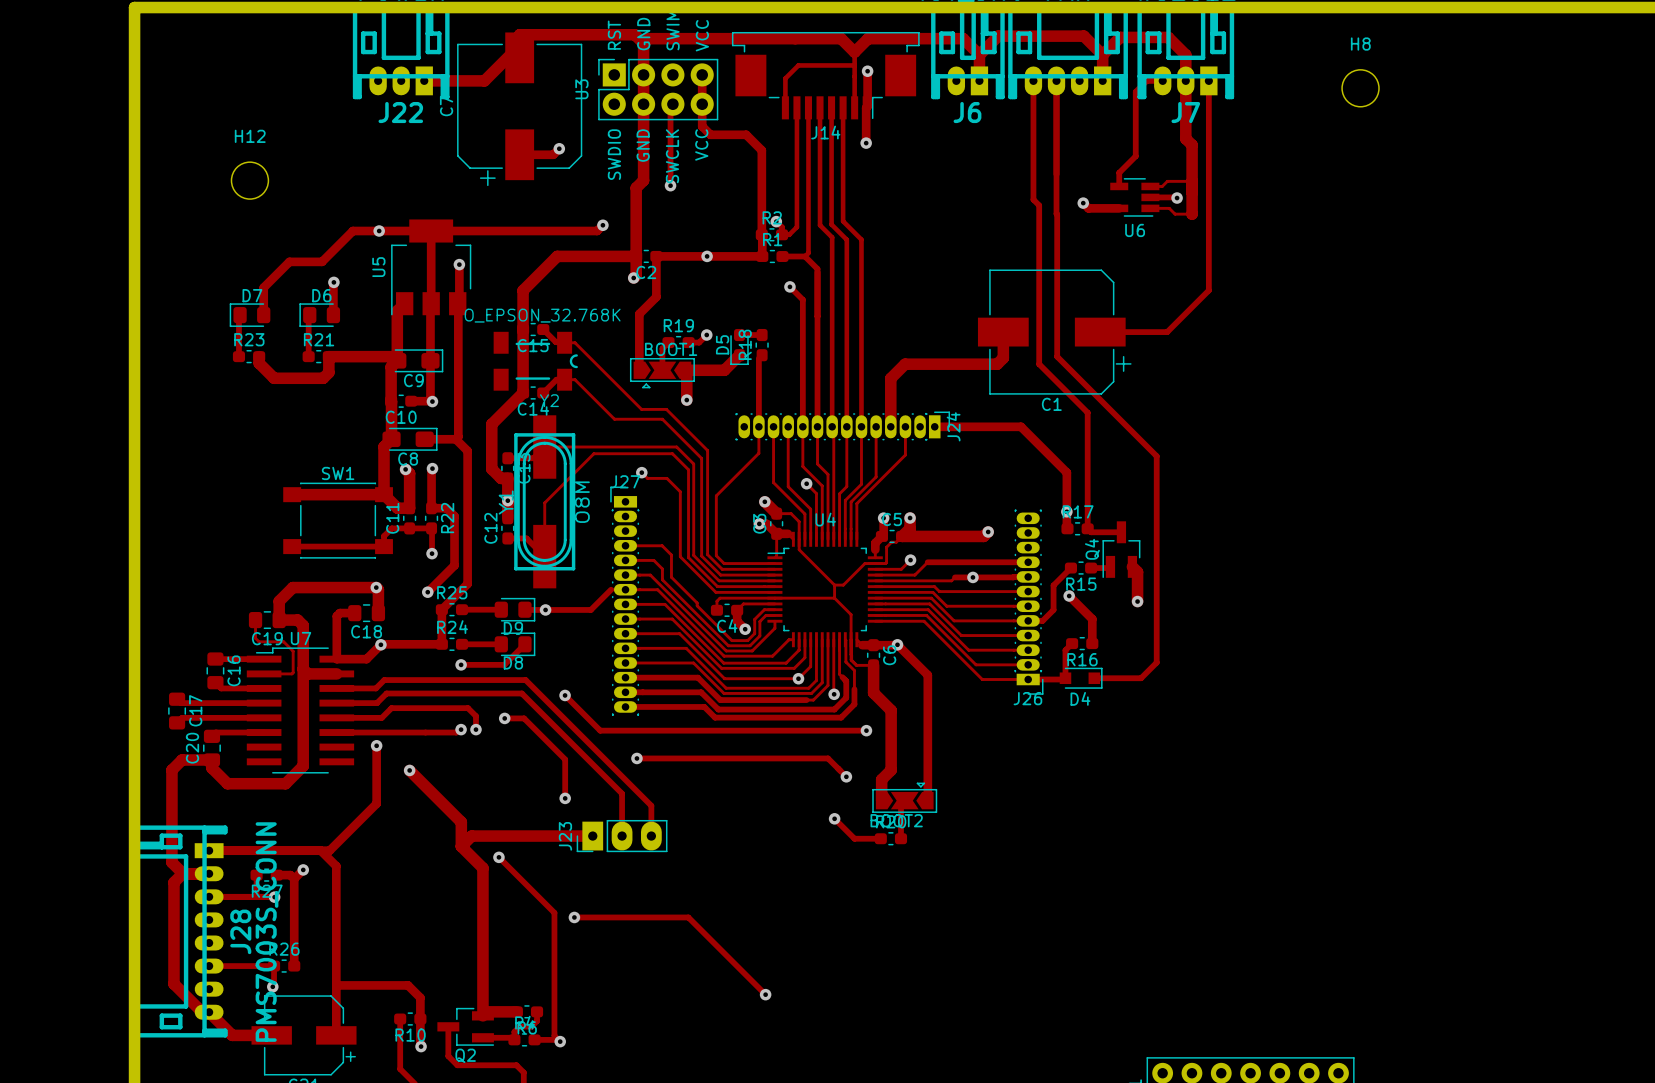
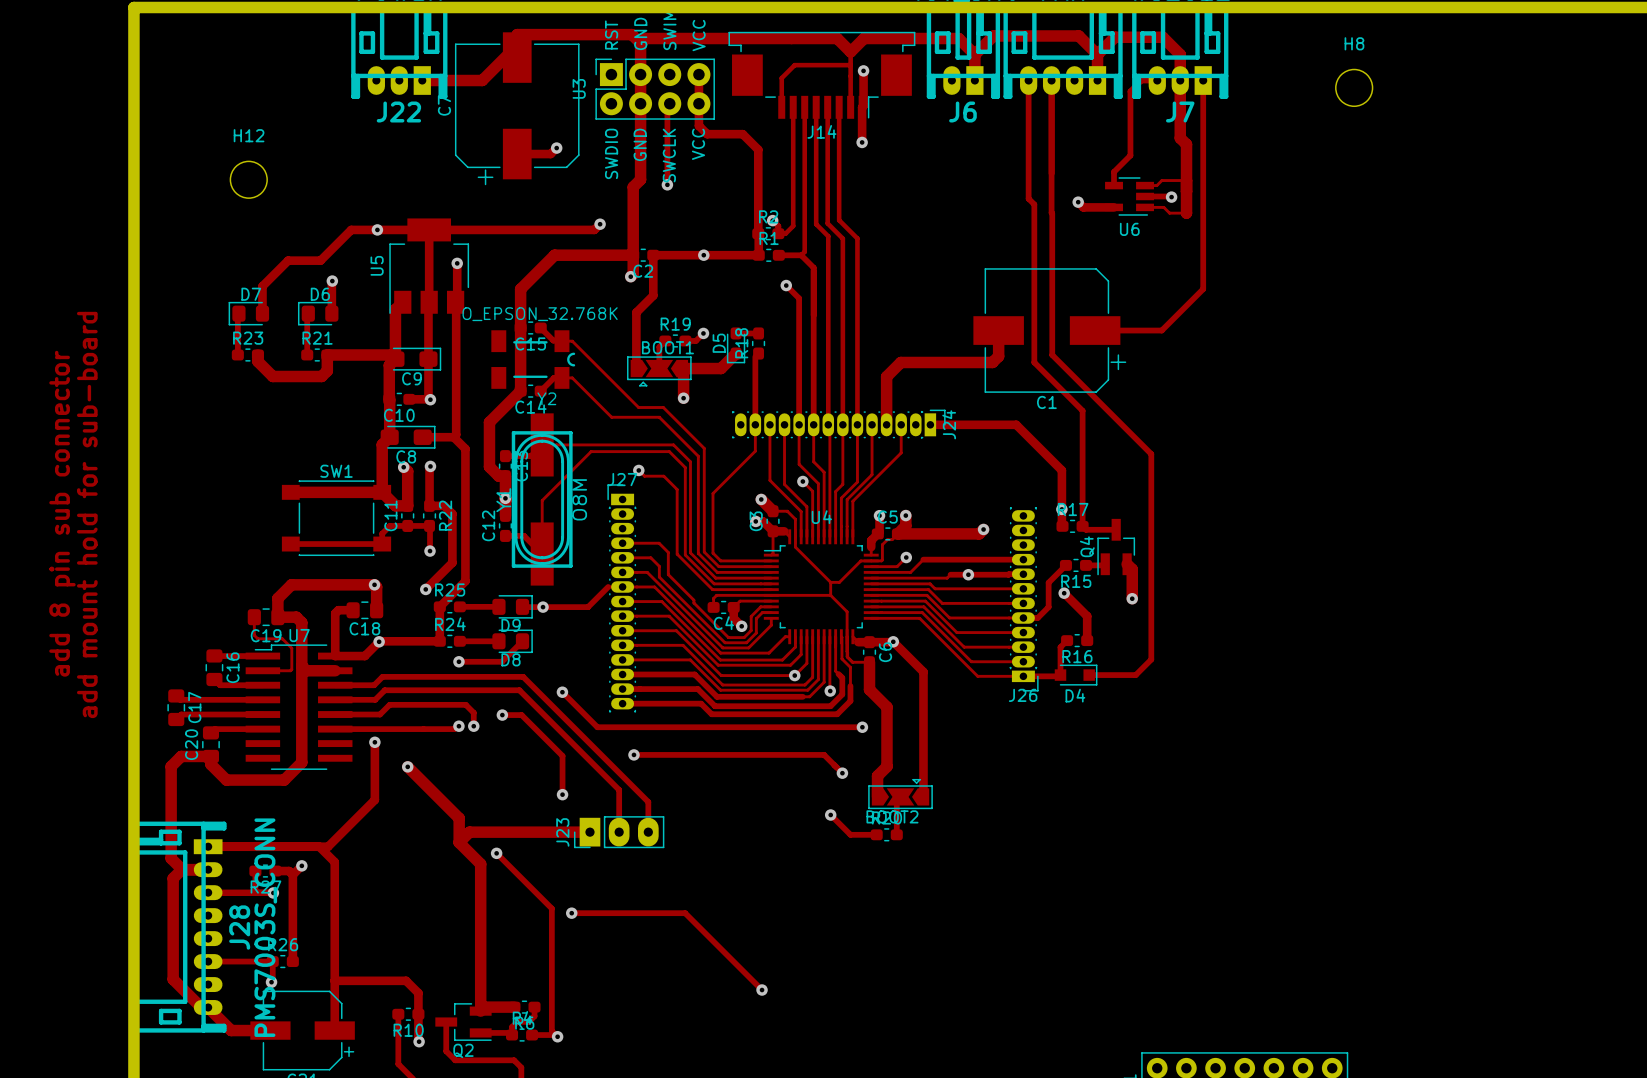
text: none -> add 8 pin sub connector (62, 513)
text: none -> add mount hold for sub-board (87, 514)

